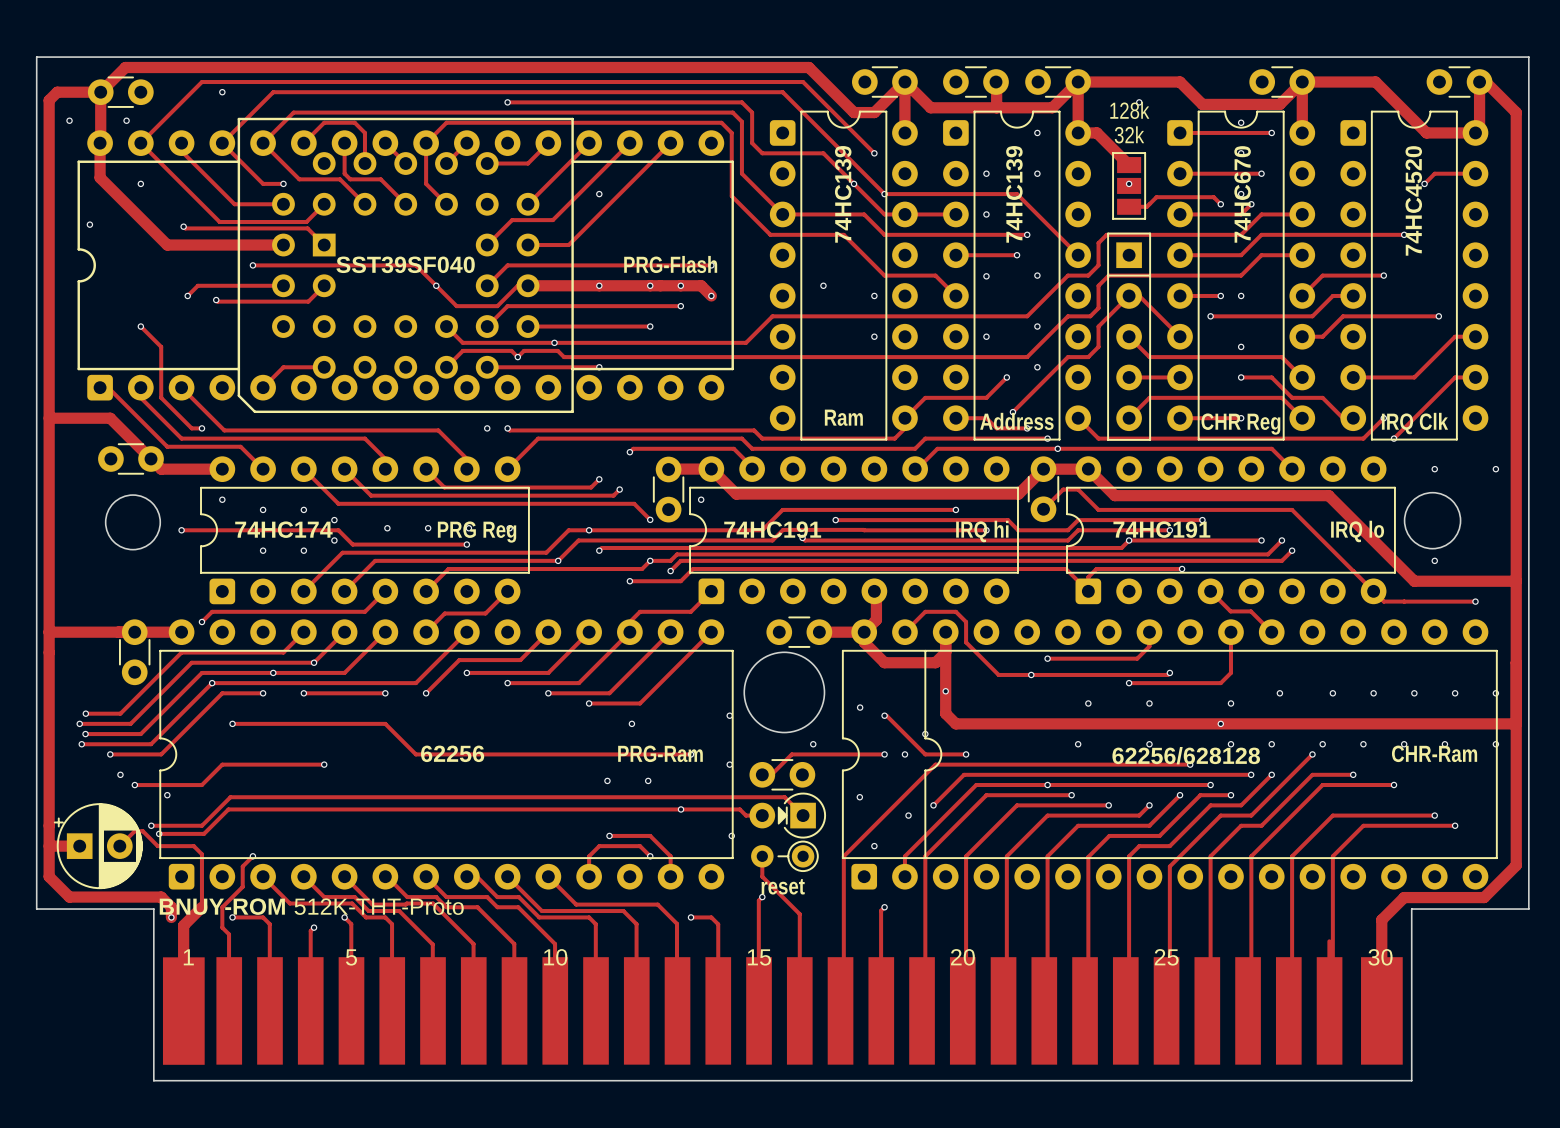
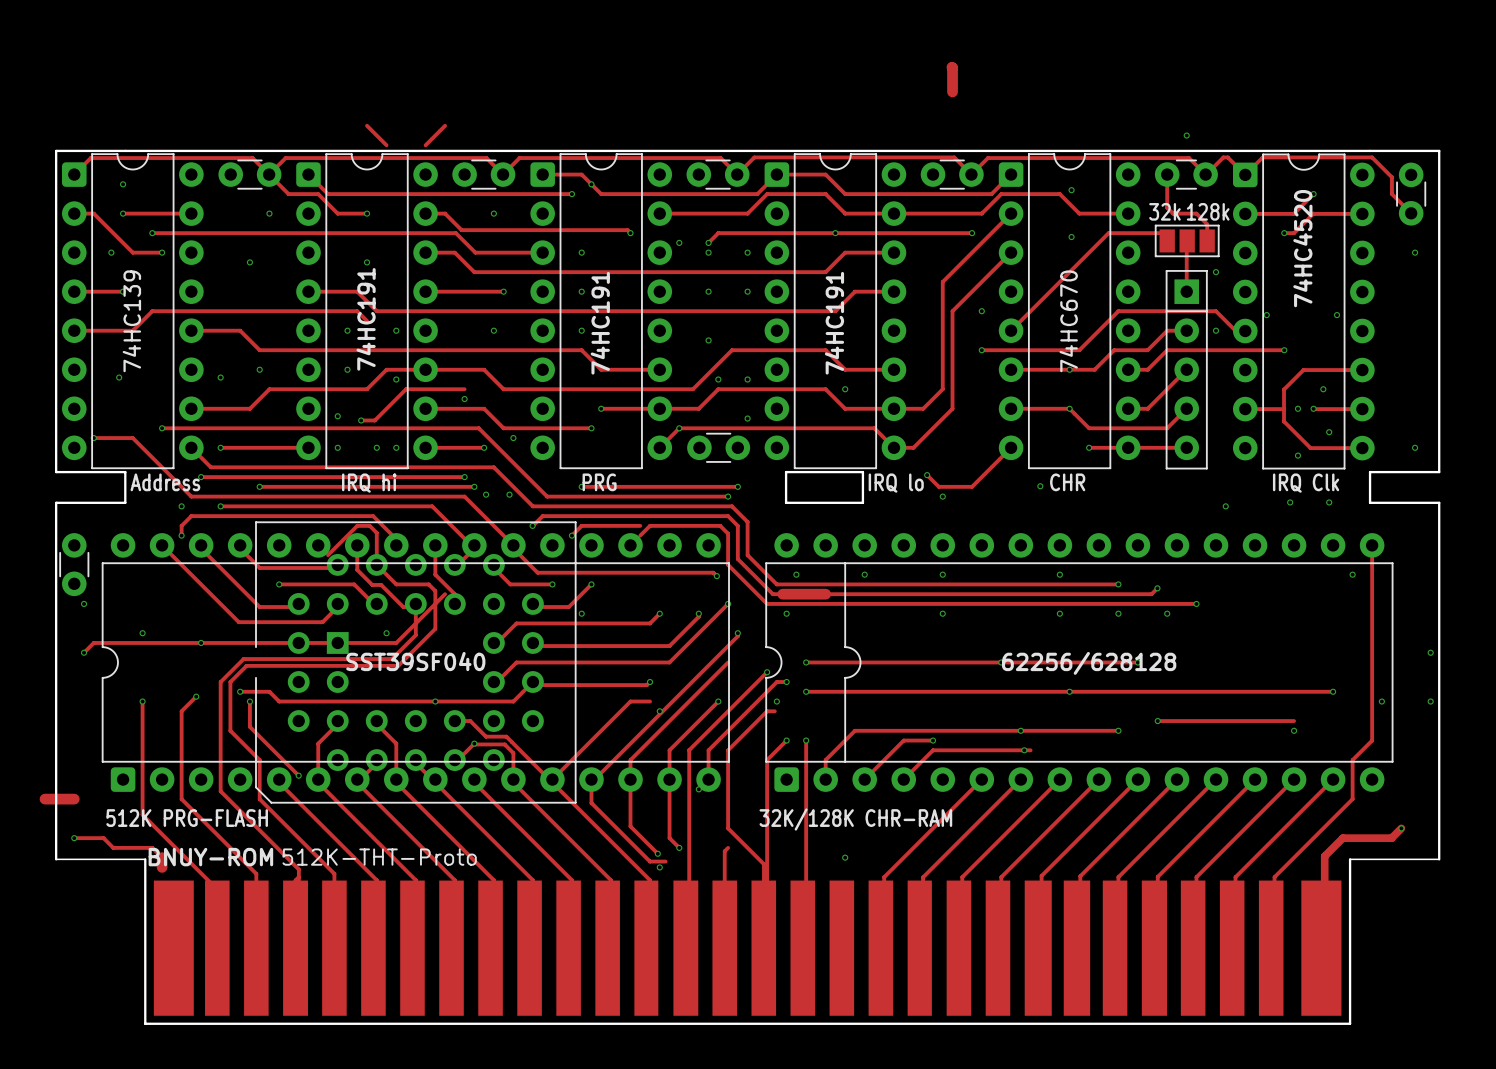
part: (884, 82) -> none
track: (904, 82) (930, 107) (1052, 107) (1078, 82) -> none
track: (904, 82) (904, 122) -> none
track: (904, 82) (874, 112) (854, 112) (808, 67) (125, 67) (100, 92) -> none
part: (975, 82) -> none
part: (1058, 82) -> none
track: (1078, 82) (1180, 82) (1202, 104) (1279, 104) (1302, 82) -> none
track: (1078, 82) (1078, 132) (1096, 132) (1129, 165) -> none
part position: (1282, 82) -> (1186, 174)
track: (1302, 82) (1375, 82) (1426, 132) (1475, 132) (1479, 128) (1479, 75) (1516, 112) (1516, 865) (1484, 897) (1404, 897) (1381, 919) (1381, 1001) -> none
track: (1302, 82) (1302, 132) -> none
part: (1459, 82) -> none
track: (100, 92) (57, 92) (49, 100) (49, 876) (69, 897) (120, 897) -> (74, 838) (103, 838) (113, 847)
track: (100, 92) (100, 177) (167, 245) (283, 245) -> none
part: (120, 92) -> none
via: (222, 92) -> none
track: (507, 102) (741, 102) (752, 112) (752, 143) (762, 153) (823, 153) (864, 194) -> (757, 194) (776, 174) (825, 174)
via: (507, 102) -> none
via: (1139, 102) -> none
text position: 128k (1129, 110) -> 128k (1208, 211)
part footprint: [1167, 110, 1316, 441] -> [1154, 224, 1220, 258]
via: (69, 120) -> none
via: (126, 120) -> none
via: (1241, 122) -> none
via: (1037, 132) -> none
track: (1180, 132) (1271, 132) -> none
via: (1271, 132) -> none
text position: 32k (1129, 134) -> 32k (1164, 211)
track: (181, 143) (181, 151) (234, 204) (283, 204) -> none
track: (303, 143) (324, 122) (354, 122) (364, 132) (364, 163) -> none
track: (344, 143) (344, 173) (350, 179) (380, 179) (405, 204) -> none
track: (548, 143) (527, 163) (487, 163) -> none
track: (589, 143) (527, 204) -> none
track: (629, 143) (552, 220) (512, 220) (487, 245) -> none
track: (670, 143) (568, 245) (527, 245) -> none
track: (874, 153) (803, 82) (201, 82) (140, 143) (219, 222) (306, 222) (324, 204) -> none
via: (874, 153) -> none
via: (986, 173) -> none
via: (1037, 173) -> none
track: (1180, 173) (1261, 173) -> none
via: (1261, 173) -> none
track: (1475, 173) (1434, 173) (1424, 183) -> none
via: (140, 183) -> none
track: (283, 183) (263, 183) (222, 143) (273, 92) (782, 92) (884, 194) (1017, 194) (1078, 255) -> none
via: (283, 183) -> none
via: (854, 183) -> none
via position: (1129, 183) -> (1071, 190)
via: (1424, 183) -> none
part: (1129, 185) -> none
track: none -> (74, 174) (90, 158) (252, 158) (288, 194) (318, 194) (337, 213) (367, 213)
part: none -> (249, 174)
track: none -> (269, 174) (285, 158) (486, 158) (503, 174) (519, 158) (720, 158) (737, 174) (754, 157) (954, 157) (971, 174) (987, 158) (1189, 158) (1206, 174) (1223, 157) (1227, 157) (1245, 174) (1262, 157) (1372, 157) (1391, 177) (1391, 194) (1411, 213)
track: none -> (308, 174) (328, 194) (571, 194)
part: none -> (483, 174)
via: (599, 194) -> none
part: none -> (718, 174)
via: (884, 194) -> none
part: none -> (952, 174)
track: none -> (1011, 174) (991, 194) (913, 194)
via: (1241, 194) -> none
part value: 74HC670 (1242, 194) -> none
via: none -> (123, 184)
track: (364, 204) (340, 179) (299, 179) (263, 143) (293, 112) (732, 112) (741, 121) (741, 173) (782, 214) -> (542, 174) (581, 174) (601, 194) (747, 194)
track: (446, 204) (426, 183) (426, 143) (446, 122) (721, 122) (731, 132) (731, 196) (770, 234) -> (659, 213) (735, 213)
via: none -> (591, 184)
track: (1220, 204) (1213, 197) (1156, 197) (1146, 206) (1129, 206) -> none
via: (1220, 204) -> none
track: (1251, 204) (1241, 214) (1180, 214) -> none
via: (1251, 204) -> none
via: none -> (571, 194)
track: (792, 214) (803, 214) -> (747, 213) (767, 194)
via: (986, 214) -> none
track: (1302, 214) (1261, 214) (1241, 234) -> (1207, 240) (1207, 224) (1196, 213) (1186, 213)
track: none -> (1313, 194) (1293, 213) (1245, 213)
via: none -> (1313, 194)
part: none -> (1411, 194)
via: (89, 224) -> none
track: (183, 226) (185, 228) (307, 228) (324, 245) -> none
via: (183, 226) -> none
part footprint: [1107, 232, 1152, 441] -> [998, 153, 1141, 470]
track: none -> (74, 213) (93, 213) (132, 252) (162, 252)
track: none -> (123, 213) (191, 213)
via: none -> (123, 213)
via: none -> (269, 213)
via: none -> (367, 213)
track: none -> (425, 213) (445, 213) (461, 230) (627, 230) (630, 233)
via: none -> (493, 213)
track: (782, 234) (843, 234) (884, 275) -> (425, 252) (454, 252) (474, 272) (825, 272) (845, 252)
via: (1027, 234) -> none
track: (1129, 234) (1106, 234) (1098, 243) (1098, 265) (1088, 275) (1067, 275) (1027, 316) (935, 316) -> (1079, 213) (1059, 194) (1001, 194) (981, 213)
track: (1180, 234) (1226, 234) -> (1167, 174) (1167, 207) (1173, 213)
track: (1404, 234) (1261, 234) (1241, 255) (1220, 255) -> none
via: (1404, 234) -> none
track: none -> (1362, 213) (1313, 213) (1294, 233) (1284, 233)
track: none -> (152, 233) (455, 233) (475, 252) (542, 252)
via: none -> (152, 233)
via: none -> (630, 233)
via: none -> (835, 233)
track: none -> (913, 233) (718, 233) (708, 242)
track: none -> (1128, 233) (1108, 233) (1011, 330)
track: none -> (1187, 233) (1186, 291)
track: (1302, 255) (1261, 255) (1241, 275) (1108, 275) (1098, 285) (1098, 308) (1090, 316) (1067, 316) (1027, 357) (564, 357) (557, 350) (524, 350) (517, 357) (511, 350) (462, 350) (446, 367) -> none
via: none -> (1284, 233)
via: none -> (1071, 237)
text: PRG-Flash (670, 264) -> none
track: (252, 265) (415, 265) (456, 306) (497, 306) (517, 285) (701, 285) (711, 295) -> none
via: (252, 265) -> none
part: SST39SF040 (405, 265) -> none
track: (711, 265) (507, 265) (487, 285) -> none
via: none -> (708, 242)
via: none -> (111, 252)
via: none -> (162, 252)
via: none -> (708, 252)
via: none -> (747, 252)
part: 74HC139 (843, 275) -> none
track: (935, 275) (955, 295) -> none
part: 74HC139 (1017, 275) -> none
via: (1037, 275) -> none
track: none -> (1011, 252) (952, 311) (952, 408) (913, 447) (893, 447) (874, 428) (679, 428) (659, 447)
track: (1383, 275) (1322, 275) (1302, 295) -> none
via: (1383, 275) -> none
part position: (1414, 275) -> (1303, 311)
via: none -> (1415, 252)
via: (986, 276) -> none
via: none -> (249, 262)
track: (283, 285) (197, 285) (187, 295) -> none
track: (324, 285) (308, 301) (217, 301) (216, 300) -> none
via: none -> (367, 262)
via: (436, 285) -> none
via position: (599, 285) -> (581, 252)
via: (650, 285) -> none
via: (680, 285) -> none
via: (823, 285) -> none
via: (187, 295) -> none
via: (711, 295) -> none
via: (874, 295) -> none
track: (1180, 295) (1220, 295) -> (1245, 409) (1284, 409)
via: (1220, 295) -> none
via: (1241, 295) -> none
via: none -> (1216, 272)
track: (1353, 295) (1332, 295) (1312, 316) (1210, 316) -> none
via: (216, 300) -> none
track: (680, 306) (507, 306) (487, 326) -> none
via: (680, 306) -> none
track: none -> (74, 291) (123, 291)
track: none -> (425, 291) (503, 291)
via: none -> (503, 291)
via: none -> (581, 291)
via: none -> (708, 291)
via: none -> (747, 291)
track: (894, 316) (772, 316) (746, 342) (462, 342) (446, 326) -> (854, 291) (835, 311) (376, 311) (357, 291) (308, 291)
via: (1210, 316) -> none
track: (1438, 316) (1343, 316) (1322, 336) (1302, 336) -> none
via: (1438, 316) -> none
track: (140, 326) (161, 346) (161, 397) (191, 428) (201, 428) -> none
via position: (140, 326) -> (123, 291)
track: (527, 326) (650, 326) -> none
via: (650, 326) -> none
via position: (1037, 326) -> (981, 311)
part: none -> 74HC139 (132, 311)
part: none -> 74HC191 (367, 311)
part: none -> 74HC191 (601, 311)
part: none -> 74HC191 (835, 311)
via: (874, 336) -> none
via: (986, 336) -> none
track: (1129, 336) (1149, 357) (1220, 357) -> (1128, 350) (1147, 350) (1167, 330)
track: (1180, 336) (1139, 295) (1129, 295) (1098, 326) (1098, 346) (1088, 357) (1067, 357) (1012, 412) -> none
track: (1475, 336) (1455, 336) (1414, 377) (1353, 377) -> none
via: none -> (1266, 315)
via: none -> (1337, 315)
via: (554, 342) -> none
track: none -> (367, 320) (357, 311) (152, 311) (132, 330) (74, 330)
part value: none -> 74HC670 (1068, 321)
via: (1241, 346) -> none
track: none -> (191, 330) (240, 330) (259, 350) (581, 350) (601, 369) (659, 369)
via: none -> (347, 330)
via: none -> (396, 330)
track: (1241, 357) (1281, 357) (1302, 377) -> none
via: none -> (1216, 330)
track: none -> (1245, 331) (1235, 331) (1216, 311) (1118, 311) (1079, 350) (981, 350)
track: (324, 367) (283, 367) (263, 387) -> none
track: (487, 367) (599, 367) -> none
via position: (599, 367) -> (581, 330)
via: none -> (708, 340)
via: (1037, 367) -> none
track: (1006, 377) (986, 397) (935, 397) -> none
via: (1006, 377) -> none
via: none -> (981, 350)
track: (1129, 377) (1165, 377) -> (1011, 369) (1094, 369) (1114, 350)
via: (1241, 377) -> none
track: (1271, 377) (1292, 397) (1322, 397) (1343, 418) (1353, 418) -> (1216, 350) (1284, 350)
via: none -> (1284, 350)
track: (1475, 377) (1455, 377) (1393, 438) -> none
track: (100, 387) (108, 387) (167, 446) (240, 446) (263, 469) -> none
track: (140, 387) (140, 397) (181, 438) (201, 438) -> none
track: (181, 387) (224, 430) (438, 430) (471, 464) -> none
via: none -> (259, 369)
via: none -> (347, 369)
track: (925, 397) (904, 418) (904, 428) (894, 438) -> (884, 408) (854, 408)
via: none -> (1069, 369)
track: (1169, 397) (1149, 397) (1129, 418) -> none
track: (1200, 397) (1281, 397) (1302, 418) -> (1147, 369) (1167, 350) (1186, 350)
part: none -> (1186, 369)
track: none -> (1362, 370) (1303, 370) (1284, 389) (1284, 421) (1310, 448) (1362, 448)
via: none -> (119, 377)
via: none -> (220, 377)
via: none -> (396, 379)
via: none -> (718, 379)
via: none -> (747, 379)
via: (1012, 412) -> none
text: Ram (843, 417) -> none
track: (49, 418) (110, 418) (161, 469) (222, 469) -> none
track: none -> (464, 389) (406, 389) (374, 420) (361, 420)
via: none -> (845, 389)
track: (955, 418) (986, 418) (996, 428) (1027, 428) -> none
track: (1078, 418) (1098, 438) -> (1011, 408) (1050, 408)
track: (1180, 418) (1241, 418) -> none
via: (1241, 418) -> none
track: (1383, 418) (1363, 438) (1200, 438) -> (1186, 369) (1147, 408)
text: Address (1016, 421) -> none
text position: IRQ Clk (1415, 423) -> IRQ Clk (1306, 483)
text: CHR Reg (1240, 424) -> none
via: (201, 428) -> none
track: (507, 428) (509, 430) (754, 430) (762, 438) (884, 438) -> none
via: (507, 428) -> none
via: (1027, 428) -> none
track: (263, 438) (364, 438) (385, 458) (385, 469) -> (249, 408) (269, 389) (367, 389) (386, 369) (484, 369) (503, 389) (692, 389) (731, 350) (825, 350) (845, 369) (884, 369)
track: none -> (425, 408) (484, 408) (503, 428) (591, 428)
track: (629, 438) (538, 438) (507, 469) -> none
via: none -> (601, 408)
track: (731, 438) (741, 438) (752, 448) (915, 448) (925, 438) -> (698, 408) (718, 389) (825, 389) (845, 408)
track: (966, 438) (1047, 438) -> (923, 408) (942, 389) (942, 281) (1011, 213)
via: (1047, 438) -> none
track: (1118, 438) (1180, 438) -> (1069, 408) (1089, 428) (1167, 428) (1186, 408)
via: none -> (1069, 408)
via: none -> (1297, 408)
track: none -> (1313, 408) (1362, 409)
via: none -> (1313, 408)
via: (1393, 438) -> none
via: none -> (337, 416)
via: none -> (747, 418)
via: (1057, 448) -> none
via: none -> (361, 420)
track: (629, 452) (633, 448) (733, 448) (754, 469) -> none
via: (629, 452) -> none
part: (130, 458) -> none
via: none -> (162, 428)
via: none -> (591, 428)
via: none -> (679, 428)
via: none -> (1329, 432)
via: none -> (93, 438)
track: (303, 469) (338, 503) (634, 503) (650, 519) -> none
track: (344, 469) (371, 495) (613, 495) (619, 489) -> none
track: (426, 469) (444, 487) (591, 487) (599, 479) -> none
via: none -> (513, 438)
track: (917, 469) (937, 448) (1271, 448) (1292, 469) -> none
track: (1088, 469) (1043, 469) (1018, 494) (736, 494) (711, 469) (670, 469) -> none
track: (1088, 469) (1114, 495) (1328, 495) (1414, 581) (1516, 581) -> none
via: (1434, 469) -> none
via position: (1495, 469) -> (1415, 447)
track: none -> (220, 447) (308, 447)
via: none -> (220, 447)
via: none -> (337, 447)
via: none -> (376, 447)
via: none -> (396, 447)
track: none -> (425, 447) (484, 447)
via: none -> (484, 447)
via: (599, 479) -> none
track: none -> (1089, 447) (1186, 447)
via: none -> (1089, 447)
via: none -> (1297, 455)
via: (619, 489) -> none
part rotation: 0° (668, 489) -> 90° clockwise (718, 447)
part position: (668, 489) -> (718, 447)
part: (1043, 489) -> none
round board edge: [1403, 491, 1462, 550] -> none
round board edge: [104, 494, 162, 551] -> none
via: (222, 499) -> none
via: (701, 499) -> none
board edge: none -> (786, 472) (786, 502) (862, 502) (862, 472) (786, 472)
track: none -> (201, 477) (464, 477)
via: none -> (201, 477)
via position: (263, 509) -> (259, 486)
via: (303, 509) -> none
via: none -> (464, 477)
track: (955, 509) (782, 509) (762, 530) -> none
via position: (955, 509) -> (927, 475)
track: (1043, 509) (1063, 489) (1078, 489) (1098, 509) (1292, 509) (1383, 601) (1475, 601) -> none
text: none -> Address (165, 482)
text: none -> PRG (599, 482)
text: none -> CHR (1067, 482)
text: none -> IRQ hi (369, 483)
via: (650, 519) -> none
via: none -> (1040, 486)
track: none -> (259, 486) (474, 486)
via: (334, 520) -> none
via: none -> (474, 486)
track: none -> (581, 486) (737, 486)
via: none -> (581, 486)
via: none -> (737, 486)
track: (835, 520) (982, 520) -> (927, 475) (938, 486)
via: (835, 520) -> none
track: (1008, 520) (1018, 530) (1067, 530) (1078, 520) (1202, 520) -> (963, 486) (972, 486) (1011, 447)
via: (1202, 520) -> none
via: (387, 528) -> none
via: (428, 528) -> none
via: (468, 528) -> none
via: none -> (509, 494)
track: (181, 530) (201, 530) -> (93, 438) (132, 438) (191, 496)
via position: (181, 530) -> (181, 506)
track: (338, 530) (352, 544) (466, 544) -> (322, 496) (464, 496) (513, 545)
part: 74HC174 (364, 530) -> none
track: (573, 530) (568, 530) (546, 552) (342, 552) (303, 591) -> (547, 496) (478, 428) (162, 428)
via: (589, 530) -> none
via: none -> (728, 496)
part: 74HC191 (854, 530) -> none
track: (986, 530) (783, 529) (772, 540) (766, 540) -> (1118, 584) (776, 584) (747, 555) (747, 521) (731, 506)
track: (1169, 530) (1078, 530) (1067, 540) (805, 540) (802, 537) -> none
via: (1169, 530) -> none
part: 74HC191 (1230, 530) -> none
text: IRQ hi (982, 531) -> IRQ lo (896, 483)
text: IRQ lo (1357, 531) -> none
text: PRG Reg (477, 532) -> none
via: none -> (1290, 502)
via: none -> (1329, 502)
via: (802, 537) -> none
track: none -> (220, 506) (432, 506) (474, 548) (454, 567)
via: none -> (220, 506)
via: (334, 540) -> none
track: (578, 540) (558, 560) (388, 560) -> (552, 506) (532, 506) (493, 467) (210, 467) (191, 447)
via: (1129, 540) -> none
track: (1261, 540) (1129, 540) (1121, 547) (601, 547) (599, 550) -> none
via: (1261, 540) -> none
track: (1281, 540) (1267, 554) (677, 554) (670, 560) -> none
via: (466, 544) -> none
via: (263, 550) -> none
via: (303, 550) -> none
via: (599, 550) -> none
track: (1292, 550) (1281, 560) (754, 560) -> (1196, 603) (767, 603) (728, 564) (728, 533) (720, 525)
via: (1292, 550) -> none
track: none -> (369, 525) (376, 532) (376, 564) (396, 584) (428, 584) (435, 590) (435, 628) (398, 665) (246, 665) (230, 682) (230, 730) (259, 760) (259, 799) (288, 828)
track: none -> (532, 525) (542, 516) (728, 516) (737, 525) (737, 559) (772, 594) (782, 594)
track: (650, 560) (642, 569) (448, 569) (426, 591) -> (620, 525) (581, 525) (571, 535)
via: (650, 560) -> none
via: (1434, 560) -> none
track: (1182, 569) (1096, 569) (1088, 577) (1088, 591) (1066, 569) (693, 569) (680, 581) (629, 581) -> none
via: (1182, 569) -> none
track: none -> (181, 535) (181, 525) (191, 516) (373, 516) (396, 539) (396, 548)
via: none -> (181, 535)
via: none -> (571, 535)
via: (670, 571) -> none
via: (629, 581) -> none
track: none -> (162, 548) (165, 548) (238, 622) (322, 622) (337, 607)
track: none -> (201, 548) (259, 607) (298, 607)
track: none -> (240, 548) (259, 567) (337, 567)
track: none -> (357, 548) (357, 569) (372, 584) (381, 584) (403, 607) (415, 607) (415, 635) (391, 659) (243, 659) (220, 682) (220, 791) (298, 869) (298, 948)
track: none -> (435, 548) (435, 574) (454, 594) (454, 607)
track: none -> (513, 548) (537, 572) (713, 572) (716, 576)
track: (385, 591) (364, 611) (212, 611) (201, 621) -> none
track: (507, 591) (485, 613) (444, 613) (426, 632) -> none
track: (713, 591) (690, 611) (640, 611) (629, 621) (629, 632) (578, 683) (507, 683) -> none
track: (876, 591) (876, 619) (864, 632) (864, 642) (884, 662) (935, 662) (945, 652) -> none
track: (1210, 591) (1230, 611) (1250, 611) (1271, 632) -> none
via: (1475, 601) -> none
track: none -> (493, 567) (510, 584) (552, 584)
via: none -> (796, 574)
via: none -> (864, 574)
via: none -> (942, 574)
via: none -> (1059, 574)
via: none -> (1352, 574)
via: none -> (716, 576)
via: (201, 621) -> none
track: none -> (279, 584) (354, 584) (376, 607)
via: none -> (279, 584)
via: none -> (552, 584)
track: none -> (591, 584) (568, 607) (532, 607)
via: none -> (591, 584)
via: none -> (1118, 584)
track: none -> (1157, 588) (1151, 594) (825, 594)
via: none -> (1157, 588)
track: (49, 632) (181, 632) -> none
track: (303, 632) (283, 652) (181, 652) (120, 713) (85, 713) -> none
track: (344, 632) (314, 662) (191, 662) (130, 723) (79, 723) -> none
track: (385, 632) (344, 672) (201, 672) (140, 734) (85, 734) -> none
track: (548, 632) (520, 660) (459, 660) (426, 693) -> none
track: (589, 632) (548, 672) (466, 672) -> none
track: (670, 632) (609, 693) (548, 693) -> none
track: (711, 632) (691, 652) -> none
part: (799, 632) -> none
track: (904, 632) (925, 611) (955, 611) (966, 621) (966, 642) (998, 674) (1167, 674) (1169, 672) -> none
track: (945, 632) (945, 713) (955, 723) (1516, 723) -> none
track: (1149, 632) (1149, 646) (1137, 658) (1047, 658) -> none
track: (1230, 632) (1230, 672) (1220, 683) (1129, 683) -> none
via: none -> (84, 603)
via: none -> (728, 603)
via: none -> (1196, 603)
round board edge: [743, 651, 826, 734] -> none
part position: (134, 652) -> (74, 564)
via: none -> (581, 613)
via: none -> (659, 613)
track: none -> (698, 613) (698, 616) (669, 646) (532, 646)
via: none -> (698, 613)
via: none -> (786, 613)
via: none -> (942, 613)
via: none -> (1059, 613)
via: none -> (1118, 613)
via: none -> (1167, 613)
via: (1047, 658) -> none
via: (314, 662) -> none
track: (680, 662) (640, 703) -> (728, 603) (669, 662) (610, 662)
track: none -> (650, 623) (516, 623) (493, 646)
via: none -> (142, 633)
via: (273, 672) -> none
via: none -> (386, 633)
via: (466, 672) -> none
track: none -> (737, 633) (737, 636) (591, 782) (591, 803) (650, 861) (665, 861)
via: none -> (737, 633)
via: (1169, 672) -> none
via: (1031, 674) -> none
track: (212, 683) (151, 744) (81, 744) -> (201, 642) (93, 642) (84, 652)
via: (507, 683) -> none
via: (1129, 683) -> none
via: (945, 691) -> none
via: none -> (84, 652)
track: (263, 693) (222, 693) (161, 754) (110, 754) -> none
via: (263, 693) -> none
track: (303, 693) (385, 693) -> none
via: (303, 693) -> none
via: (385, 693) -> none
via: (426, 693) -> none
via: (548, 693) -> none
via: (1279, 693) -> none
via: (1332, 693) -> none
via: (1373, 693) -> none
via: (1414, 693) -> none
via: (1455, 693) -> none
part: none -> SST39SF040 (415, 662)
track: none -> (562, 662) (516, 662) (493, 685)
via: (589, 703) -> none
track: none -> (728, 662) (630, 760) (630, 826) (657, 853)
track: none -> (806, 662) (1137, 662)
via: none -> (806, 662)
via: none -> (1001, 662)
via: (1088, 703) -> none
via: (1149, 703) -> none
via: none -> (1137, 662)
via: (1230, 703) -> none
via: (860, 707) -> none
via: (85, 713) -> none
track: none -> (767, 672) (689, 750) (689, 948)
via: none -> (767, 672)
via: (729, 715) -> none
track: (884, 715) (925, 754) (966, 754) -> none
via: (884, 715) -> none
via: (79, 723) -> none
track: (232, 723) (385, 723) (415, 754) (691, 754) -> none
via: (232, 723) -> none
track: none -> (532, 682) (513, 701) (279, 701) (269, 691) (240, 691)
via: (631, 723) -> none
track: none -> (650, 682) (646, 685) (532, 685)
via: none -> (650, 682)
track: none -> (786, 682) (776, 682) (708, 750) (708, 782)
via: none -> (786, 682)
via: (1220, 723) -> none
via: (85, 734) -> none
via: none -> (240, 691)
track: none -> (806, 691) (1333, 691)
via: none -> (806, 691)
via: (925, 734) -> none
via: none -> (1069, 691)
via: none -> (196, 696)
via: (81, 744) -> none
track: none -> (142, 701) (142, 814) (220, 892) (220, 948)
via: none -> (142, 701)
track: none -> (249, 701) (249, 726) (298, 775)
via: none -> (249, 701)
via: none -> (435, 701)
track: none -> (650, 701) (630, 701) (552, 779)
track: none -> (718, 701) (669, 750) (669, 838) (679, 847)
via: none -> (718, 701)
via: (1078, 744) -> none
via: (1149, 744) -> none
via: (1230, 744) -> none
via: (1271, 744) -> none
via: (1322, 744) -> none
via: (1363, 744) -> none
via position: (1404, 744) -> (1333, 691)
text: PRG-Ram (660, 753) -> none
text: CHR-Ram (1434, 753) -> none
via: (110, 754) -> none
part: 62256 (446, 754) -> none
track: (803, 754) (791, 754) (771, 774) (762, 774) (762, 783) -> (767, 711) (728, 750) (728, 808)
track: (811, 754) (884, 754) -> none
via: (884, 754) -> none
via: (904, 754) -> none
via: (966, 754) -> none
part position: (1169, 754) -> (1079, 662)
track: (1312, 754) (1251, 815) (1220, 815) (1169, 866) (1169, 927) -> (1216, 779) (1118, 877)
via: (1312, 754) -> none
part value position: 62256/628128 (1186, 755) -> 62256/628128 (1089, 663)
track: (324, 764) (222, 764) (201, 785) (134, 785) -> none
via: (324, 764) -> none
track: none -> (454, 721) (470, 721) (485, 736) (506, 736) (649, 879) (649, 948)
via: (729, 764) -> none
track: (1190, 764) (935, 764) (843, 856) -> (806, 740) (806, 808)
via: (1190, 764) -> none
track: none -> (1157, 721) (1294, 721)
via: none -> (1157, 721)
track: none -> (337, 724) (318, 743) (318, 782) (415, 880) (415, 948)
track: none -> (376, 724) (396, 743) (396, 782) (493, 880) (493, 948)
via: (120, 774) -> none
part: (782, 774) -> none
track: (964, 774) (933, 805) -> (921, 730) (854, 730) (825, 760) (825, 779)
via: none -> (1020, 730)
track: (1169, 774) (1251, 774) -> none
via: none -> (1118, 730)
via: (1251, 774) -> none
track: (1271, 774) (1241, 805) (1210, 805) (1190, 825) -> none
via: (1271, 774) -> none
track: (1353, 774) (1312, 774) (1261, 825) (1241, 825) (1210, 856) (1210, 998) (1207, 1001) -> none
via: (607, 780) -> none
via: (648, 780) -> none
via: (134, 785) -> none
track: none -> (786, 740) (767, 760) (767, 948)
via: none -> (786, 740)
via: none -> (806, 740)
track: none -> (933, 740) (903, 740) (864, 779)
via: none -> (933, 740)
via: (1047, 785) -> none
track: (1210, 785) (976, 785) (904, 856) (904, 876) -> none
via: (1210, 785) -> none
track: (1393, 785) (1322, 785) (1251, 856) (1251, 927) -> (1294, 779) (1196, 877)
via: (1393, 785) -> none
via: none -> (474, 743)
via: (167, 795) -> none
track: (986, 795) (925, 856) (925, 927) -> (981, 779) (884, 877)
track: none -> (942, 750) (933, 750) (903, 779)
track: none -> (1024, 750) (1030, 750)
track: (1180, 795) (1149, 825) (1078, 825) (1047, 856) (1047, 927) -> (1098, 779) (1001, 877)
via: (1180, 795) -> none
track: (1230, 795) (1200, 795) (1159, 835) (1109, 835) (1088, 856) (1088, 999) (1086, 1001) -> none
via: (1230, 795) -> none
via: (859, 797) -> none
via: (933, 805) -> none
track: (1108, 805) (1017, 805) (966, 856) (966, 998) (962, 1001) -> none
via: (1108, 805) -> none
track: (1149, 805) (1139, 815) (1047, 815) (1006, 856) (1006, 927) -> (1059, 779) (962, 877)
via: (1149, 805) -> none
track: none -> (376, 763) (357, 782) (454, 880) (454, 948)
track: none -> (415, 763) (532, 880) (532, 948)
track: none -> (454, 763) (474, 743) (504, 744) (513, 753) (513, 782) (610, 880) (610, 948)
via: (681, 809) -> none
track: (762, 815) (746, 815) (739, 809) (228, 809) (204, 833) (159, 833) -> none
part: (787, 815) -> none
track: (803, 815) (784, 797) (230, 797) (201, 825) (151, 825) -> none
via: (908, 815) -> none
track: (1434, 815) (1332, 815) (1292, 856) (1292, 927) -> (1333, 779) (1235, 877)
via: (1434, 815) -> none
via: none -> (298, 775)
via: (151, 825) -> none
track: none -> (1020, 779) (923, 877) (923, 948)
track: none -> (1176, 779) (1080, 876) (1080, 948)
track: none -> (1255, 779) (1157, 876) (1157, 948)
track: (1455, 825) (1363, 825) (1332, 856) (1332, 927) -> (1372, 545) (1372, 740) (1352, 760) (1352, 799) (1274, 877)
via: (1455, 825) -> none
track: none -> (279, 782) (376, 880) (376, 948)
track: none -> (474, 782) (571, 880) (571, 948)
via: (159, 833) -> none
track: (609, 835) (650, 835) (670, 856) (670, 876) -> none
via: (609, 835) -> none
part: (98, 846) -> none
track: (119, 846) (134, 831) (142, 831) (157, 846) (193, 846) (201, 854) (201, 907) (183, 925) (183, 1001) -> none
via: (874, 846) -> none
track: (1169, 846) (1139, 846) (1129, 856) (1129, 999) (1126, 1001) -> (1118, 799) (1041, 875) (1041, 948)
track: (252, 856) (242, 866) (242, 886) (222, 907) (222, 927) (229, 934) (229, 1001) -> none
via: (252, 856) -> none
track: (650, 856) (640, 846) (599, 846) (589, 856) (589, 876) -> none
via: (650, 856) -> none
part: (784, 856) -> none
text: none -> 512K PRG-FLASH (187, 818)
text: none -> 32K/128K CHR-RAM (855, 819)
track: (263, 876) (289, 903) (352, 903) (366, 917) (385, 917) (392, 924) (392, 1001) -> none
track: (344, 876) (372, 904) (433, 903) (473, 944) (473, 1001) -> none
track: (385, 876) (407, 897) (436, 897) -> none
track: (426, 876) (446, 897) (487, 897) (497, 907) (518, 907) (555, 944) (555, 1001) -> none
track: (466, 876) (476, 876) (497, 897) (518, 897) (539, 917) (589, 917) (595, 924) (595, 1001) -> none
track: (507, 876) (541, 911) (623, 911) (636, 924) (636, 1001) -> none
track: (548, 876) (576, 904) (657, 904) (677, 923) (677, 1001) -> none
track: none -> (1401, 828) (1391, 838) (1342, 838) (1324, 856) (1324, 948)
via: none -> (1401, 828)
via: none -> (74, 838)
text: reset (783, 886) -> none
track width: thick (120, 897) (161, 897) (171, 907) -> thin (113, 847) (152, 847) (162, 857)
track: (324, 897) (354, 897) (368, 911) (399, 911) (432, 944) (432, 1001) -> (308, 847) (328, 867)
track: (436, 897) (446, 907) (477, 907) (514, 944) (514, 1001) -> none
via: none -> (679, 847)
via: (762, 897) -> none
via: none -> (657, 853)
track: (884, 907) (881, 910) (881, 1001) -> none
part footprint: [153, 908, 1413, 1082] -> [153, 880, 1342, 1016]
board edge: (60, 909) (36, 909) (36, 57) (1528, 57) (1528, 909) (1504, 909) -> (56, 859) (56, 502) (125, 502) (125, 472) (56, 472) (56, 150) (1439, 150) (1439, 472) (1370, 472) (1370, 502) (1439, 502) (1439, 859)
board edge: none -> (145, 859) (145, 1023) (1350, 1023) (1350, 859)
via: (171, 917) -> none
track: (232, 917) (263, 917) -> (196, 696) (181, 711) (181, 799) (249, 867)
via: (232, 917) -> none
via: (344, 917) -> none
track: (691, 917) (711, 917) (718, 924) (718, 1001) -> none
via: (314, 927) -> none

